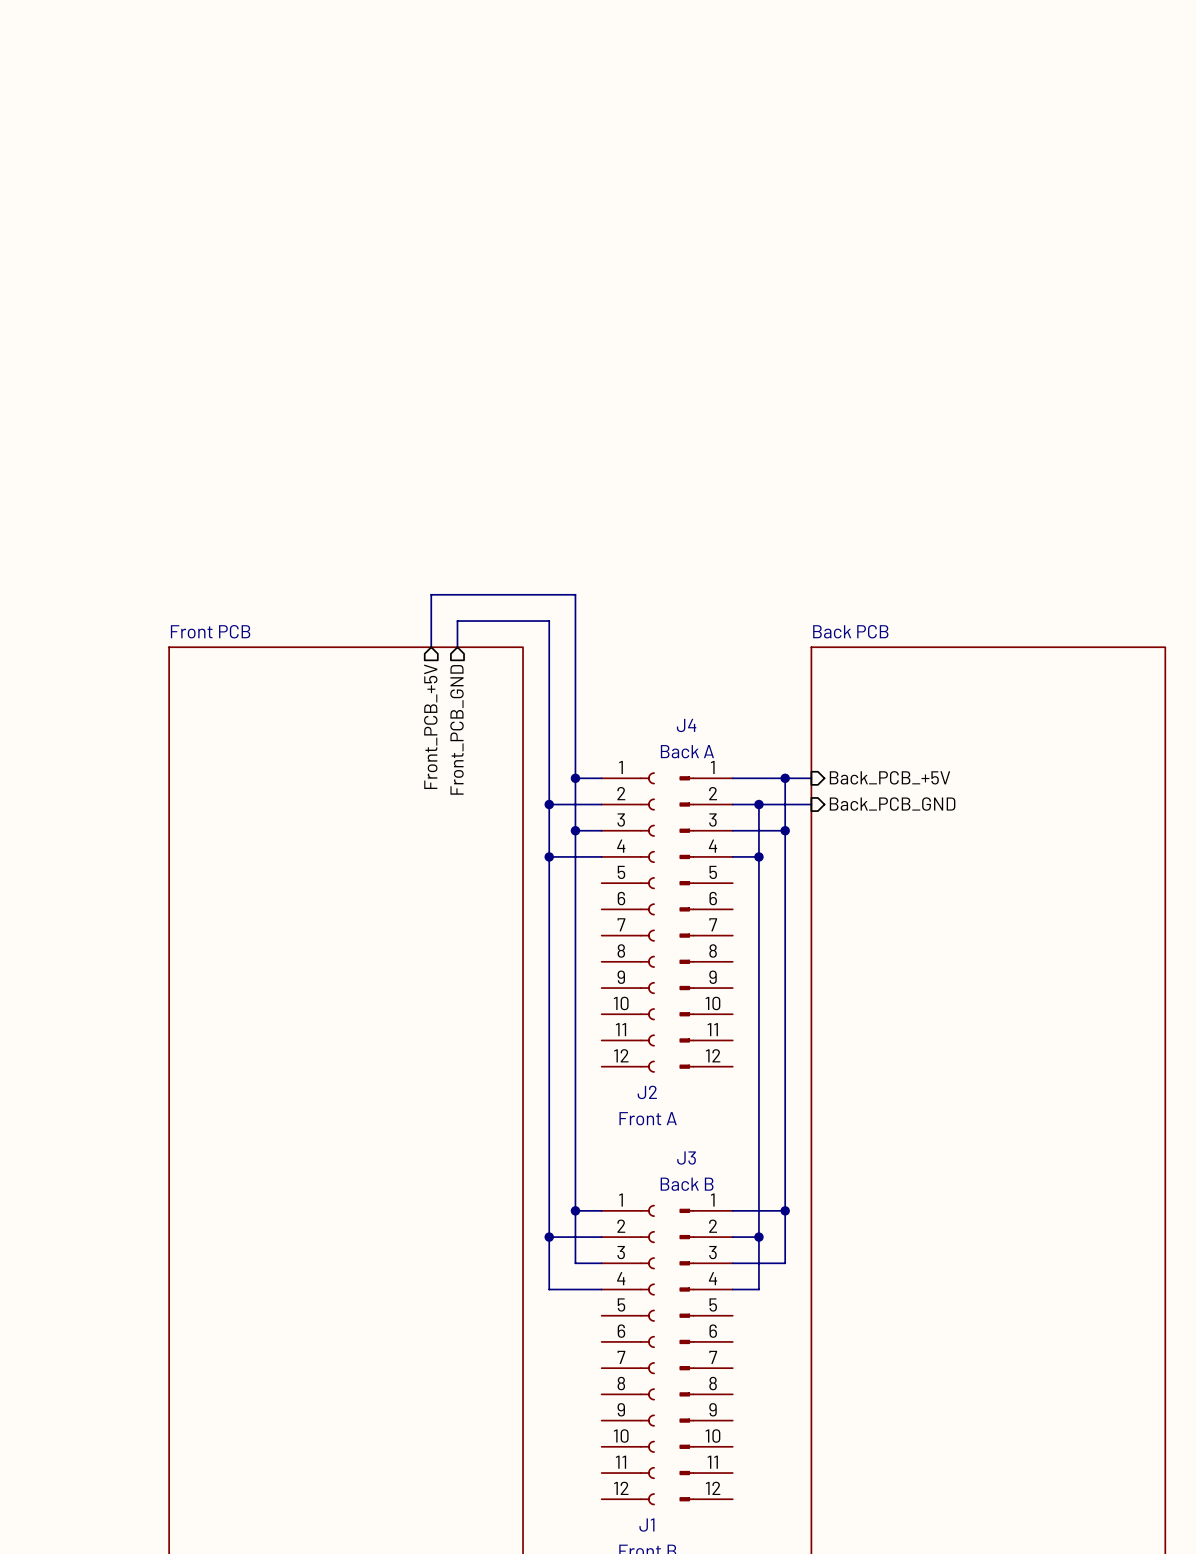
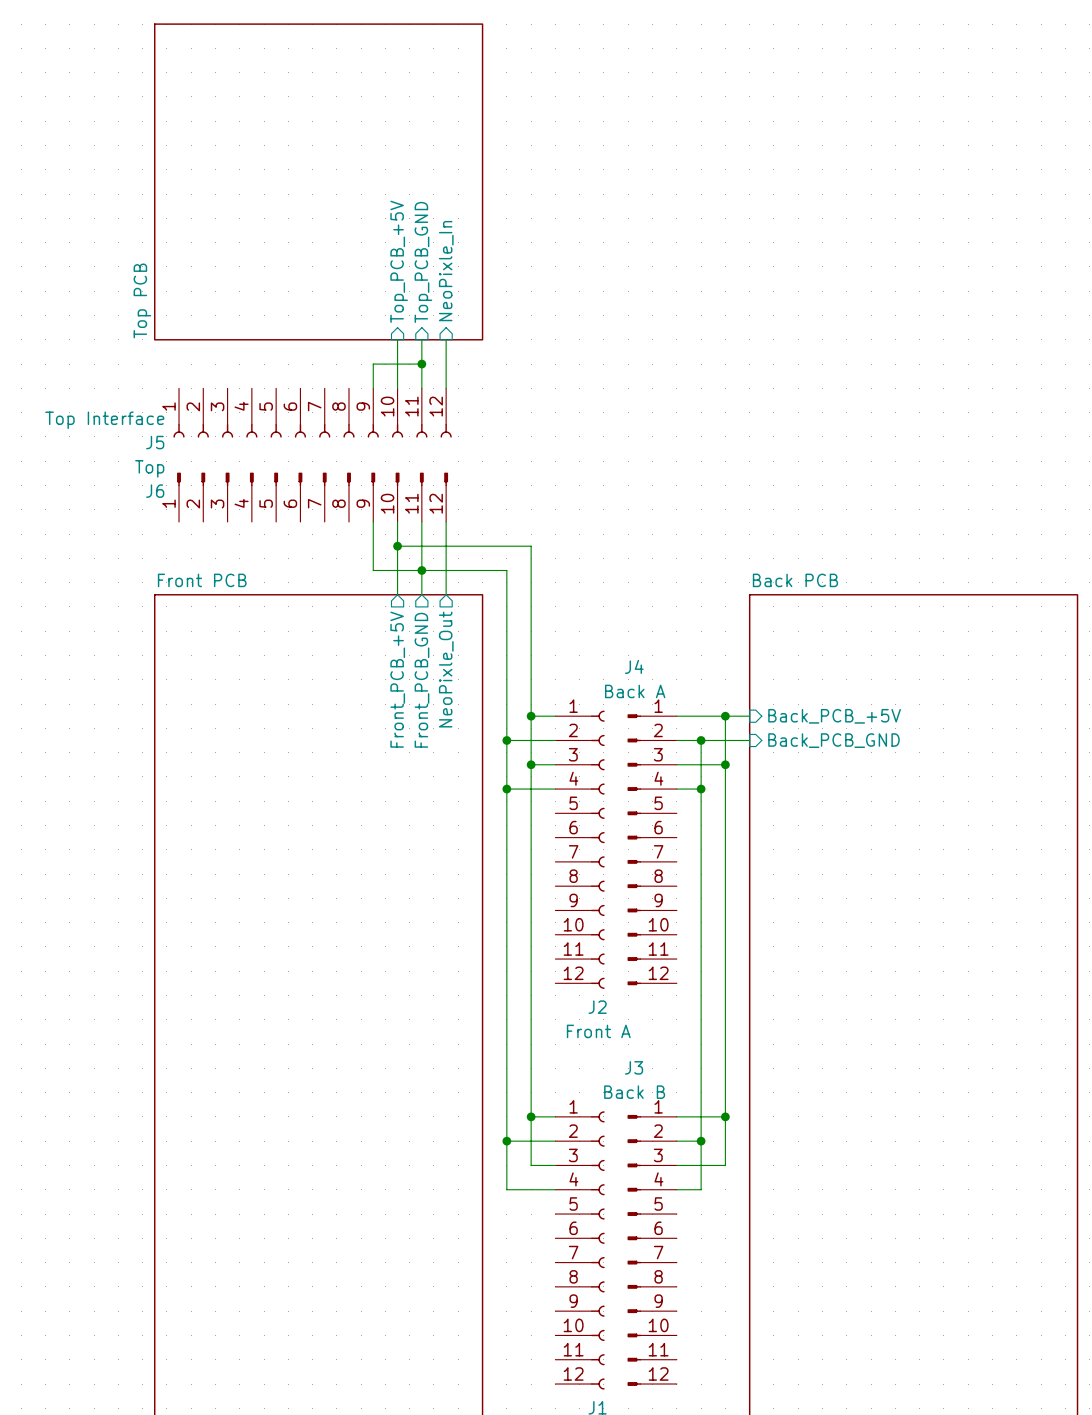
sheet Top PCB: none -> (318, 181)
sheet pin: none -> Top_PCB_GND (423, 262)
sheet pin: none -> Top_PCB_+5V (399, 261)
sheet pin: none -> NeoPixle_In (446, 271)
wire: none -> (397, 339) (397, 388)
wire: none -> (421, 339) (421, 388)
wire: none -> (446, 339) (446, 388)
wire: none -> (421, 364) (373, 364) (373, 388)
junction: none -> (421, 364)
J5: none -> Top Interface (312, 413)
J6: none -> Top (312, 497)
wire: none -> (373, 521) (373, 570) (421, 570) (421, 521)
wire: none -> (397, 521) (397, 546)
wire: none -> (446, 521) (446, 594)
junction: none -> (397, 546)
junction: none -> (421, 570)
sheet pin: none -> NeoPixle_Out (446, 669)

